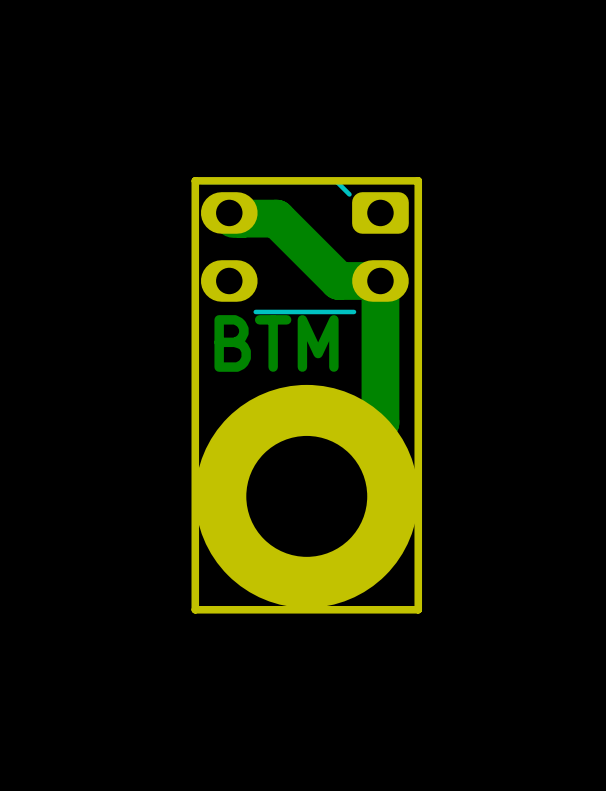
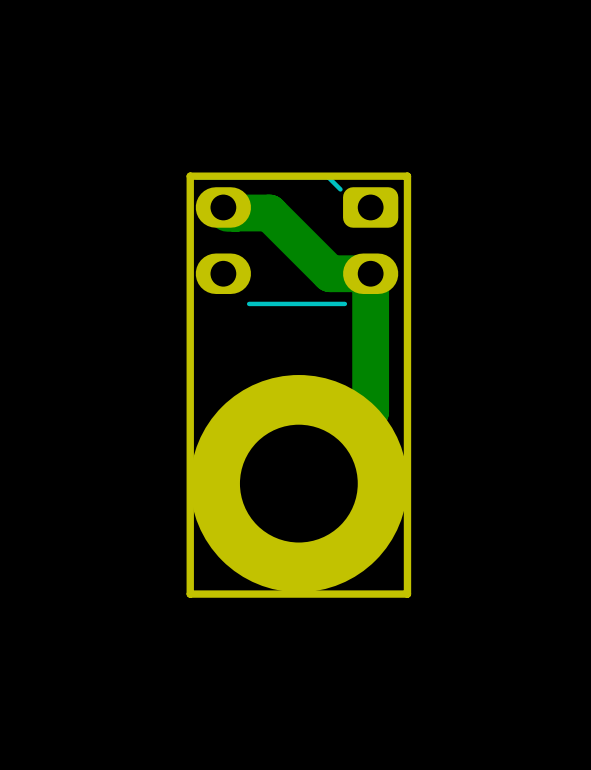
text: BTM (276, 343) -> none

